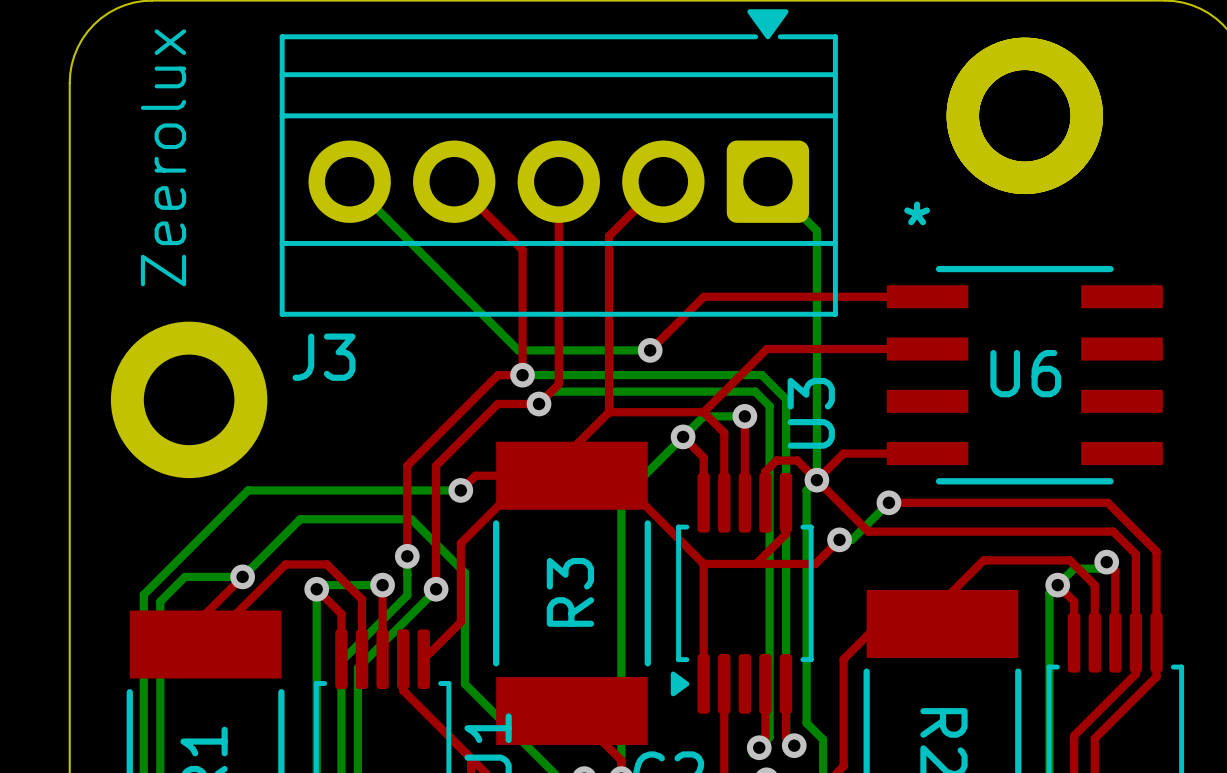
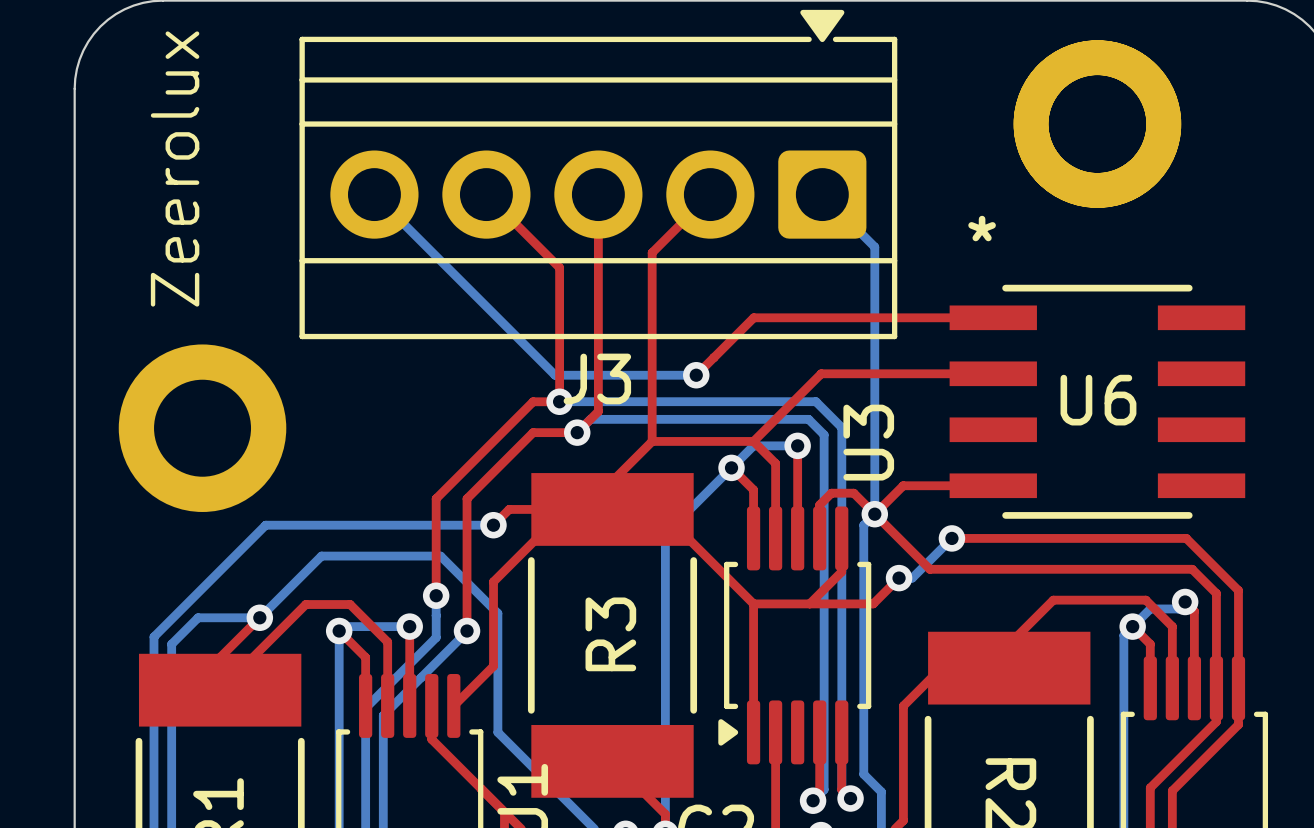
J3 name position: J3 (323, 357) -> J3 (597, 378)

